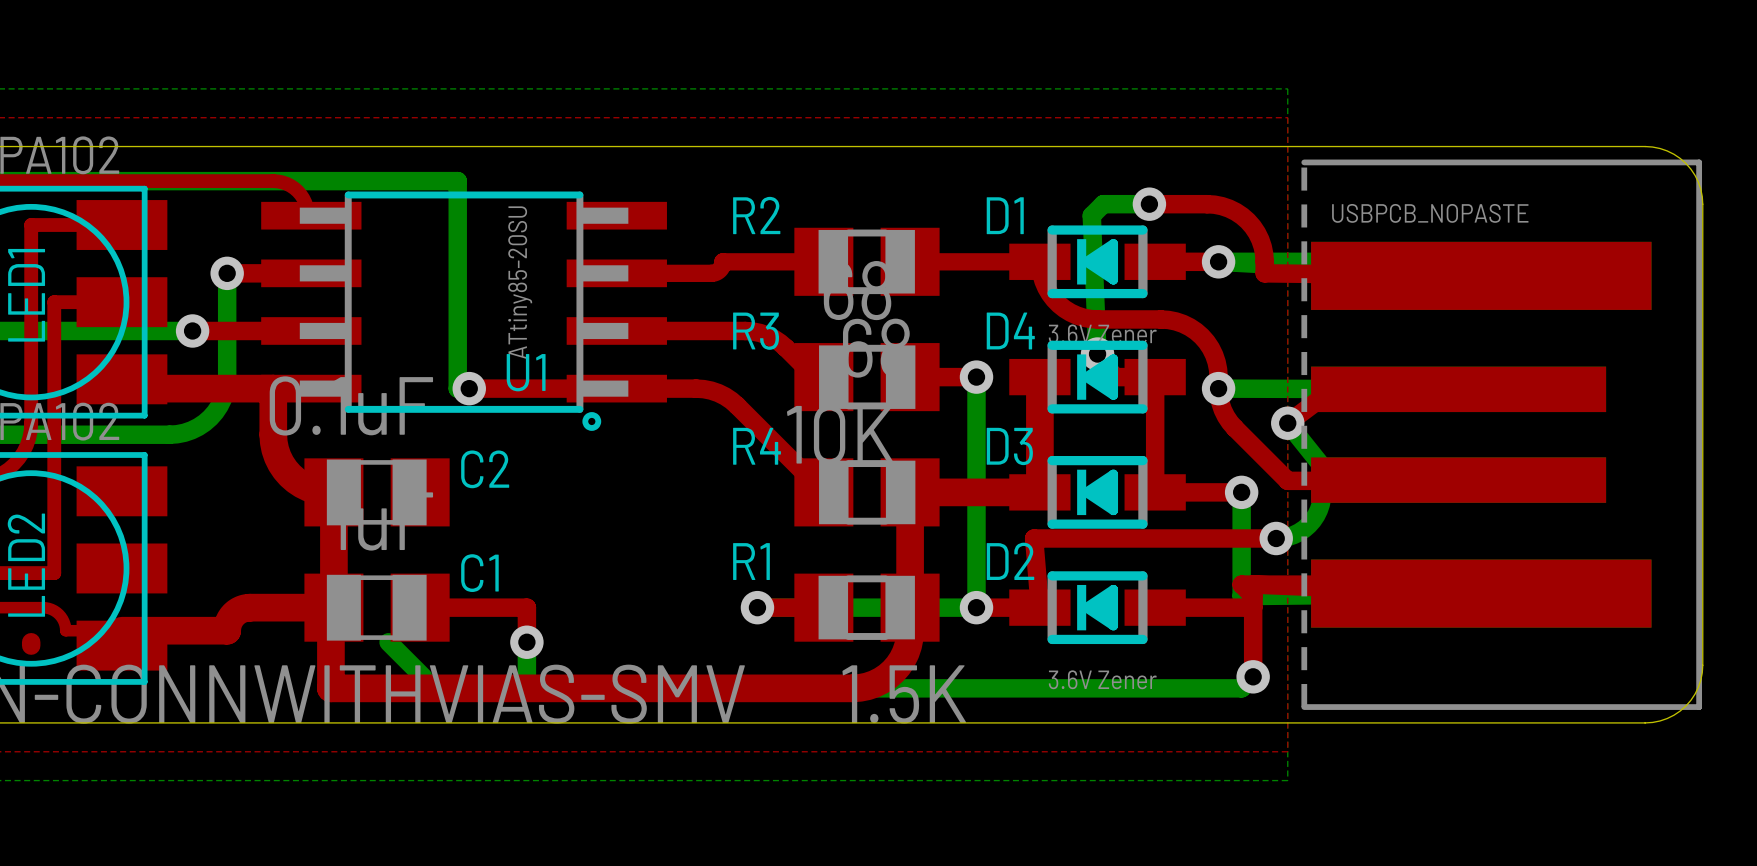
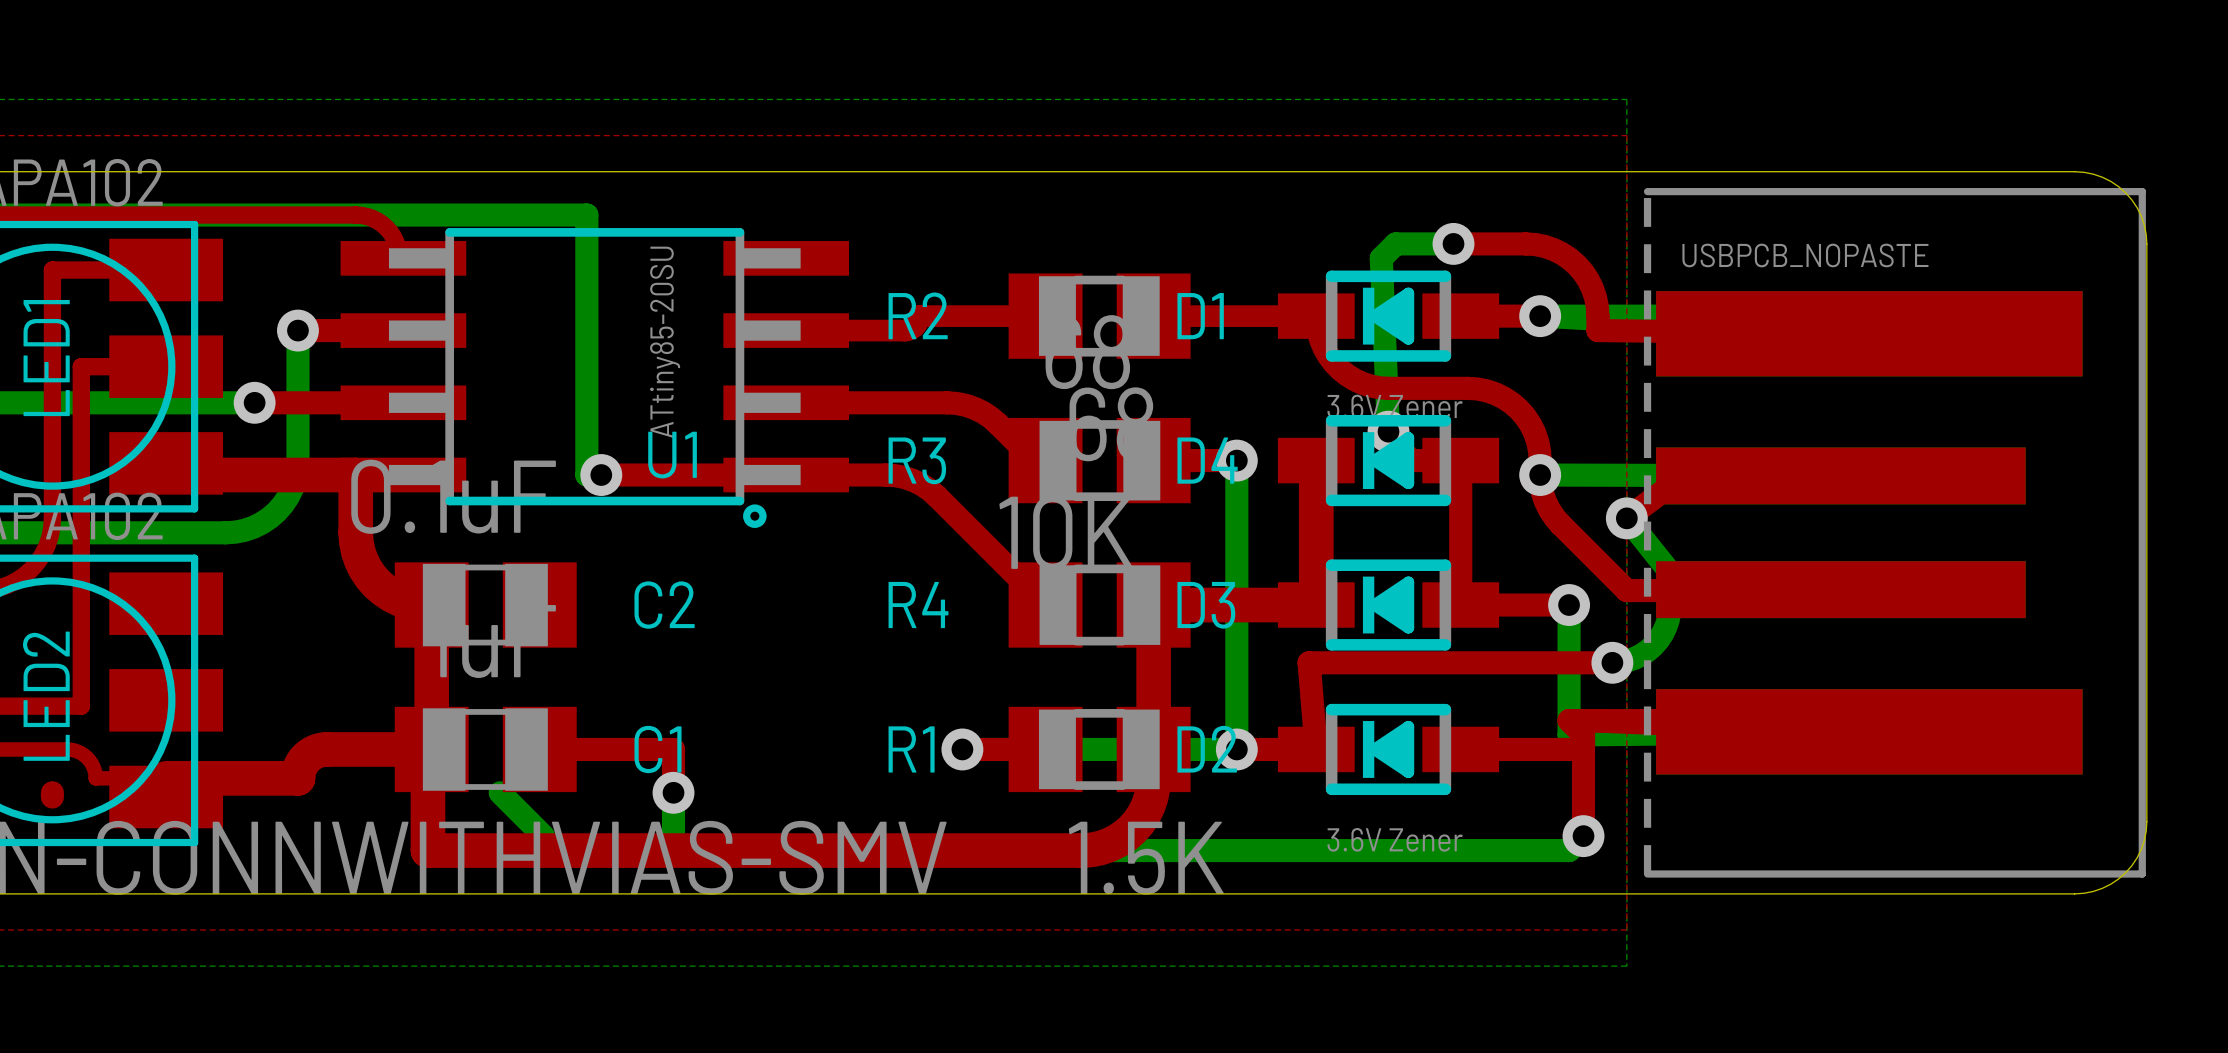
R2 name position: R2 (756, 215) -> R2 (918, 315)
D1 name position: D1 (1005, 215) -> D1 (1200, 316)
D4 name position: D4 (1010, 330) -> D4 (1207, 460)
R3 name position: R3 (756, 331) -> R3 (917, 460)
R4 name position: R4 (757, 446) -> R4 (918, 605)
D3 name position: D3 (1009, 446) -> D3 (1206, 605)
C2 name position: C2 (485, 469) -> C2 (664, 605)
R1 name position: R1 (751, 561) -> R1 (911, 749)
D2 name position: D2 (1010, 561) -> D2 (1207, 749)
C1 name position: C1 (479, 573) -> C1 (658, 749)

